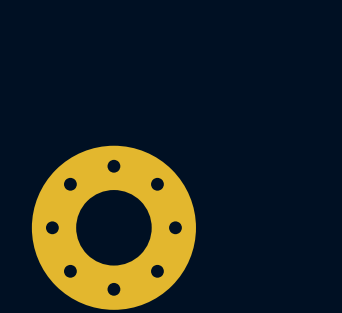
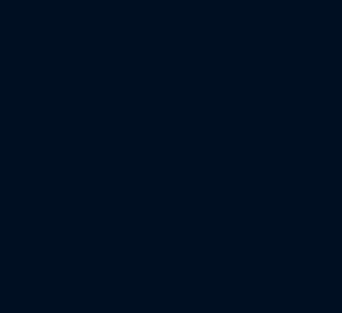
part: (113, 227) -> none

